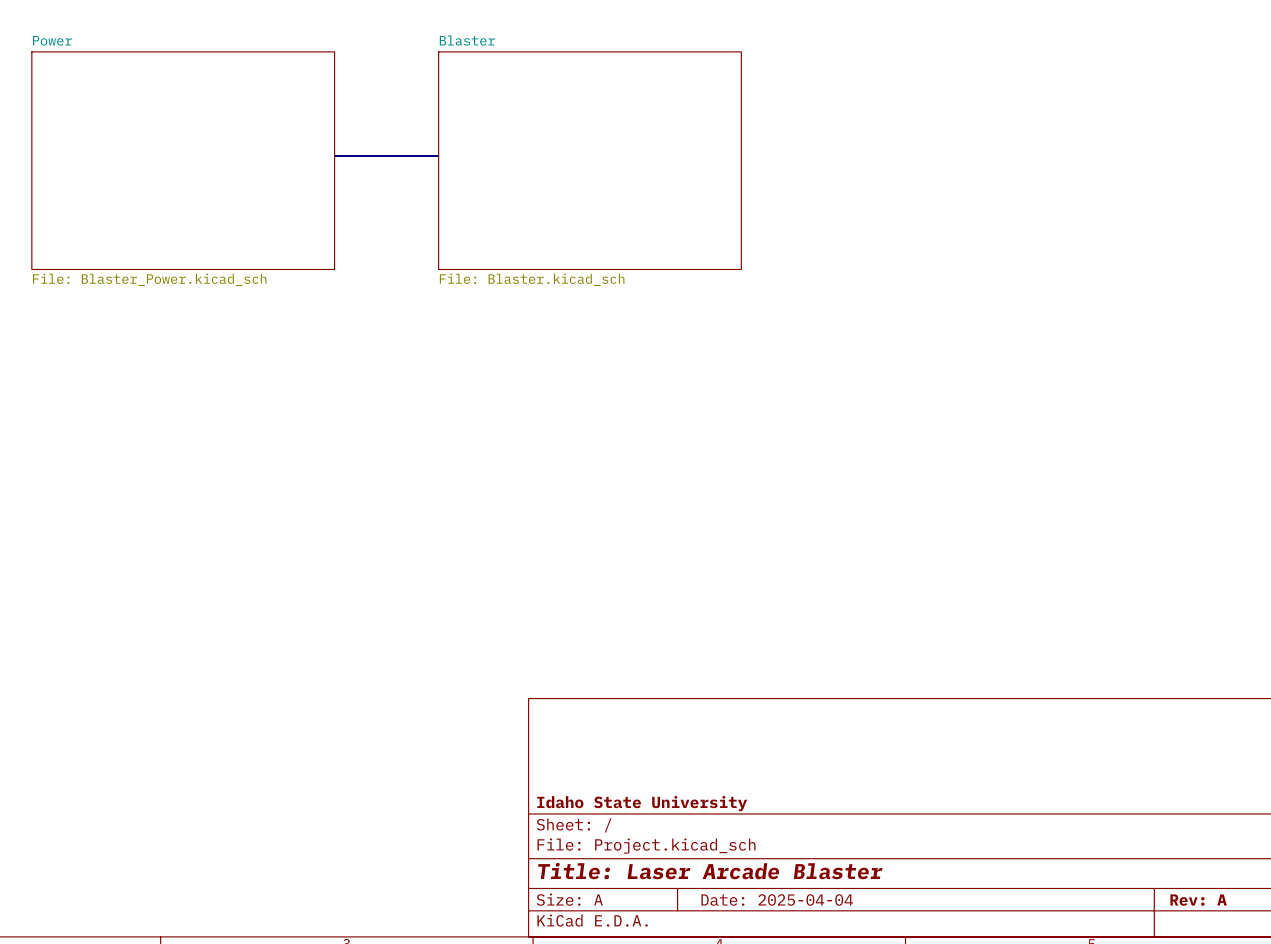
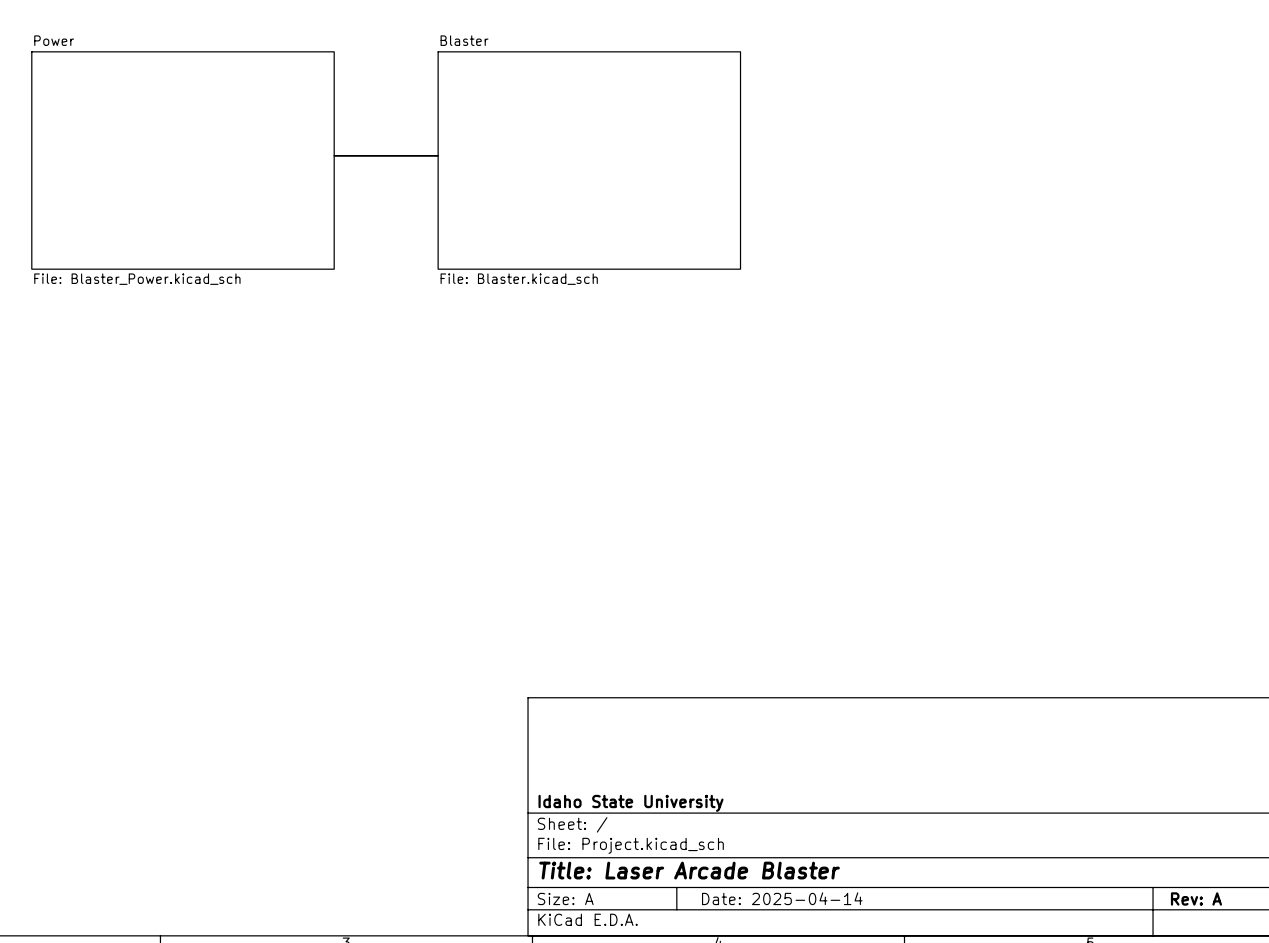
title block: Date: 2025-04-04 (777, 899) -> Date: 2025-04-14 (782, 898)

